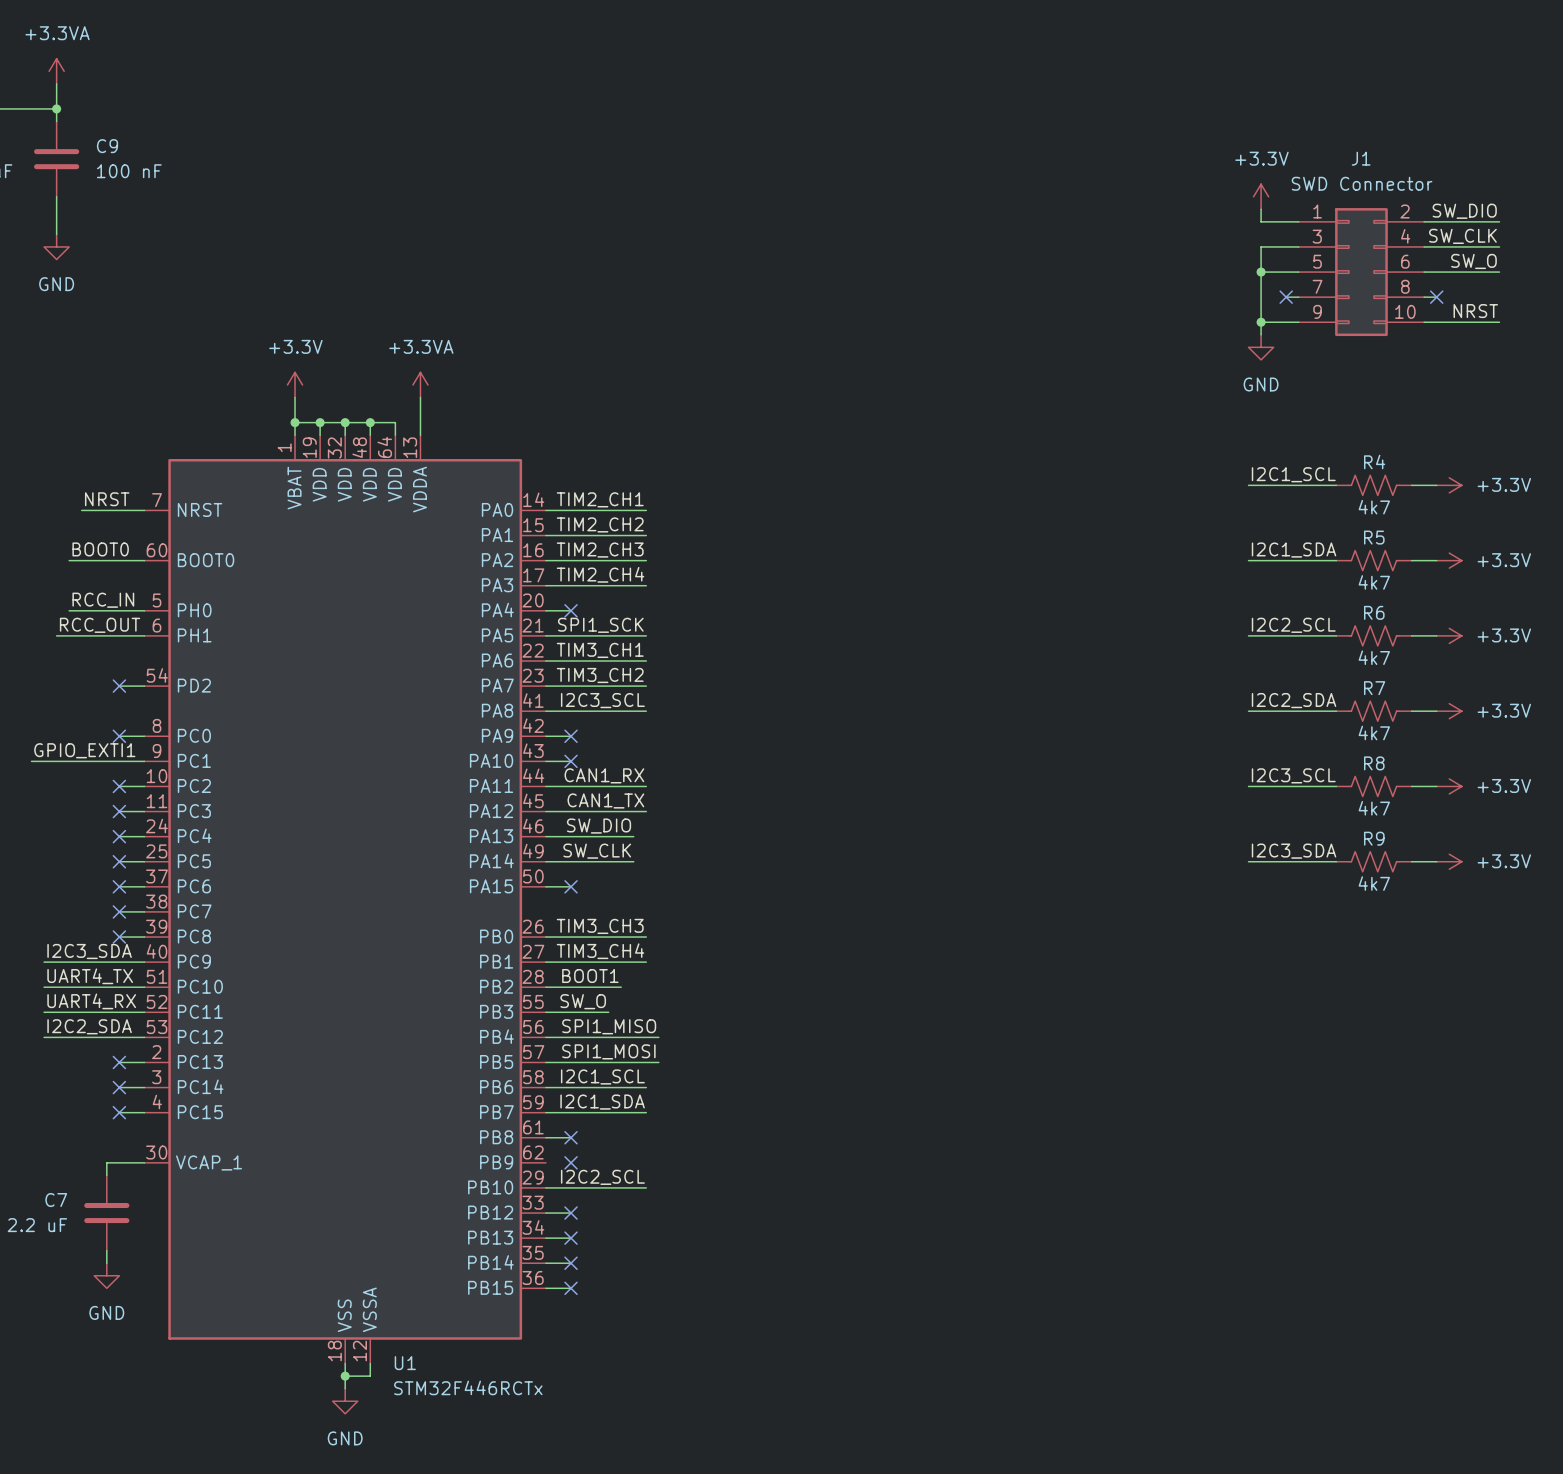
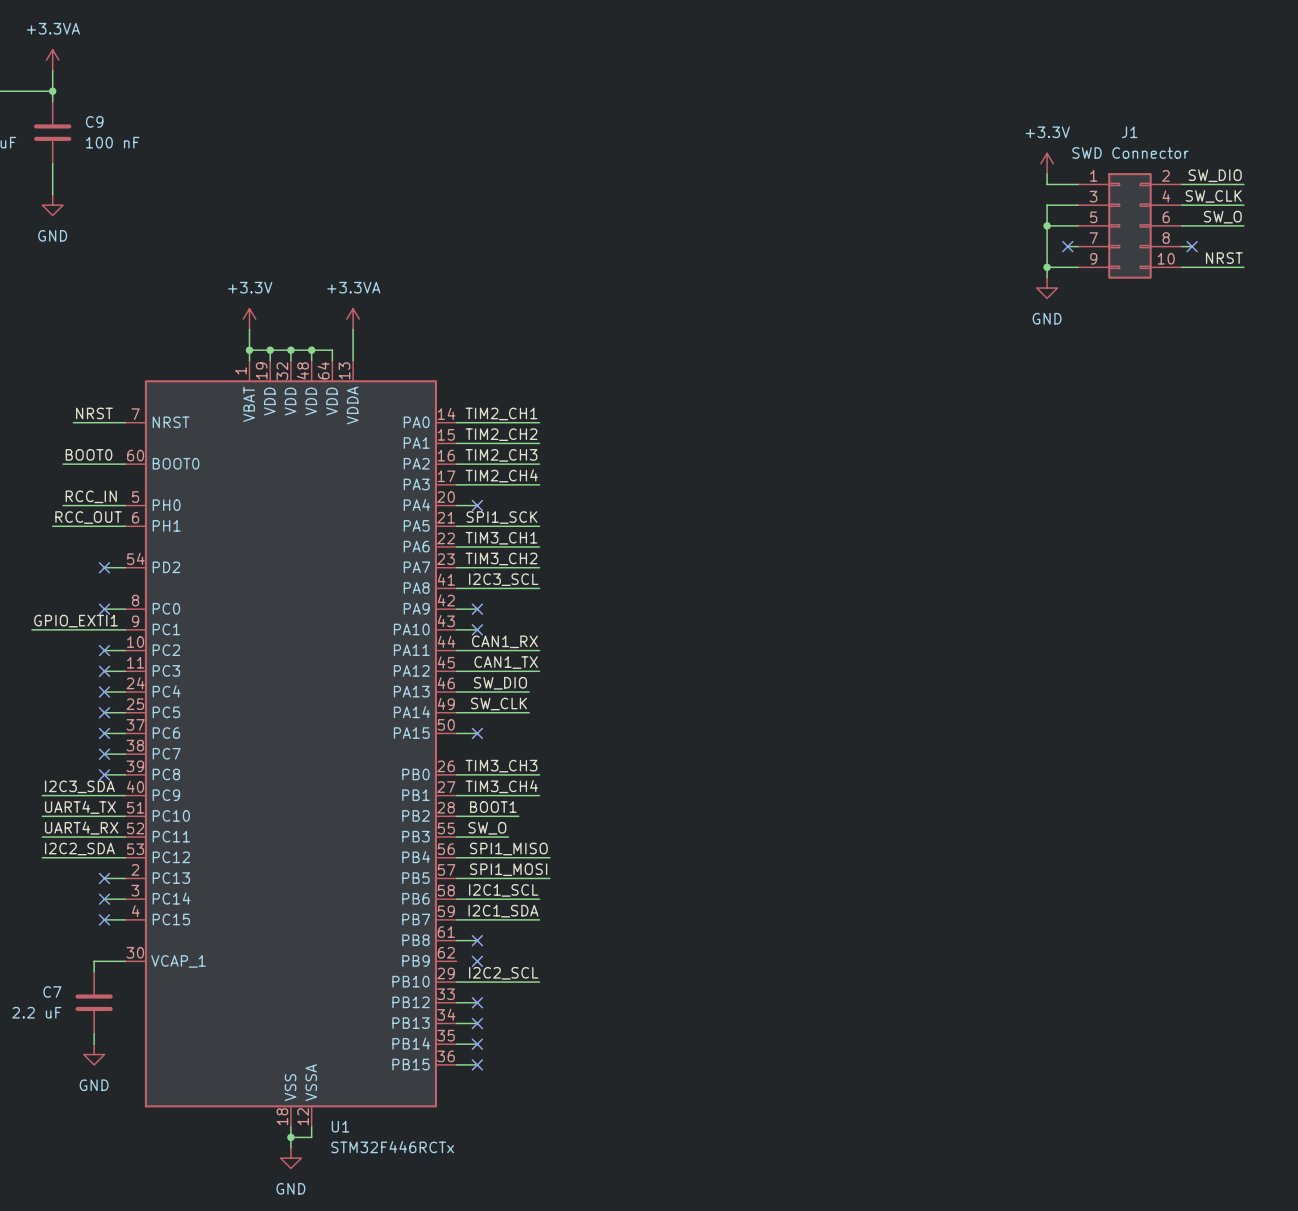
label: I2C1_SCL (1293, 474) -> none
wire: (1248, 485) (1336, 485) -> none
R4: 4k7 (1373, 485) -> none
wire: (1411, 485) (1436, 485) -> none
power symbol: +3.3V (1449, 485) -> none
label: I2C1_SDA (1294, 550) -> none
wire: (1248, 560) (1336, 560) -> none
R5: 4k7 (1373, 560) -> none
wire: (1411, 560) (1436, 560) -> none
power symbol: +3.3V (1449, 560) -> none
label: I2C2_SCL (1293, 625) -> none
wire: (1248, 635) (1336, 635) -> none
R6: 4k7 (1373, 635) -> none
wire: (1411, 635) (1436, 635) -> none
power symbol: +3.3V (1449, 635) -> none
label: I2C2_SDA (1294, 700) -> none
wire: (1248, 711) (1336, 711) -> none
R7: 4k7 (1373, 711) -> none
wire: (1411, 711) (1436, 711) -> none
power symbol: +3.3V (1449, 711) -> none
label: I2C3_SCL (1293, 775) -> none
wire: (1248, 786) (1336, 786) -> none
R8: 4k7 (1373, 786) -> none
wire: (1411, 786) (1436, 786) -> none
power symbol: +3.3V (1449, 786) -> none
label: I2C3_SDA (1294, 851) -> none
wire: (1248, 861) (1336, 861) -> none
R9: 4k7 (1373, 861) -> none
wire: (1411, 861) (1436, 861) -> none
power symbol: +3.3V (1449, 861) -> none

